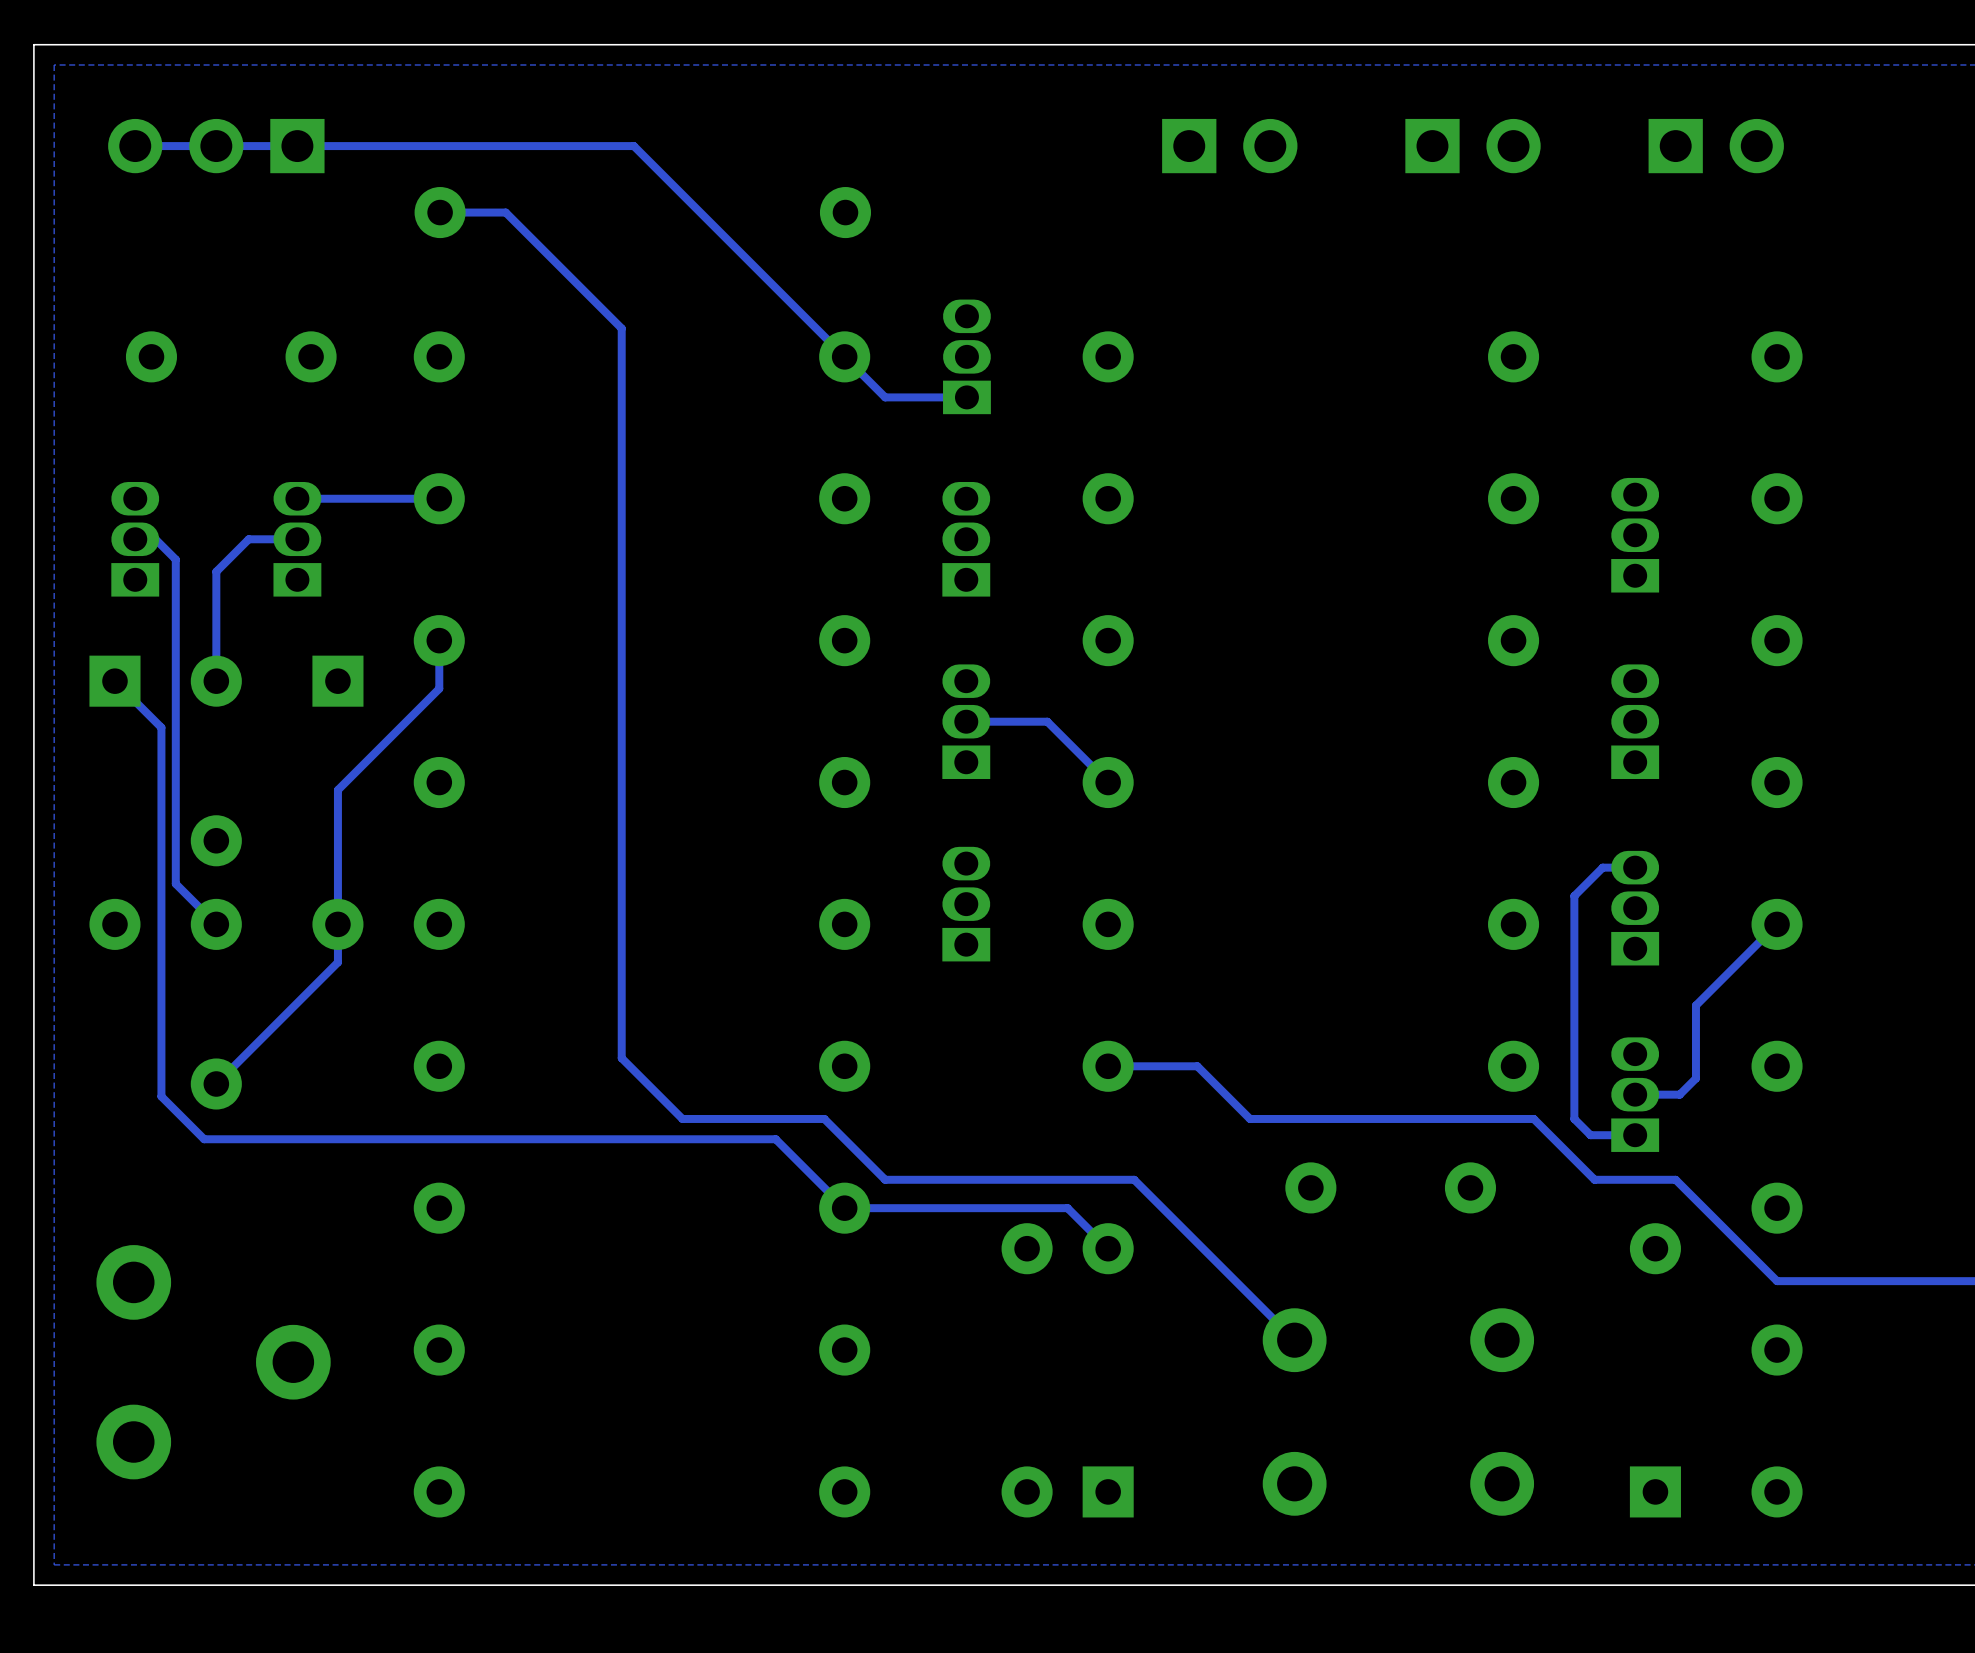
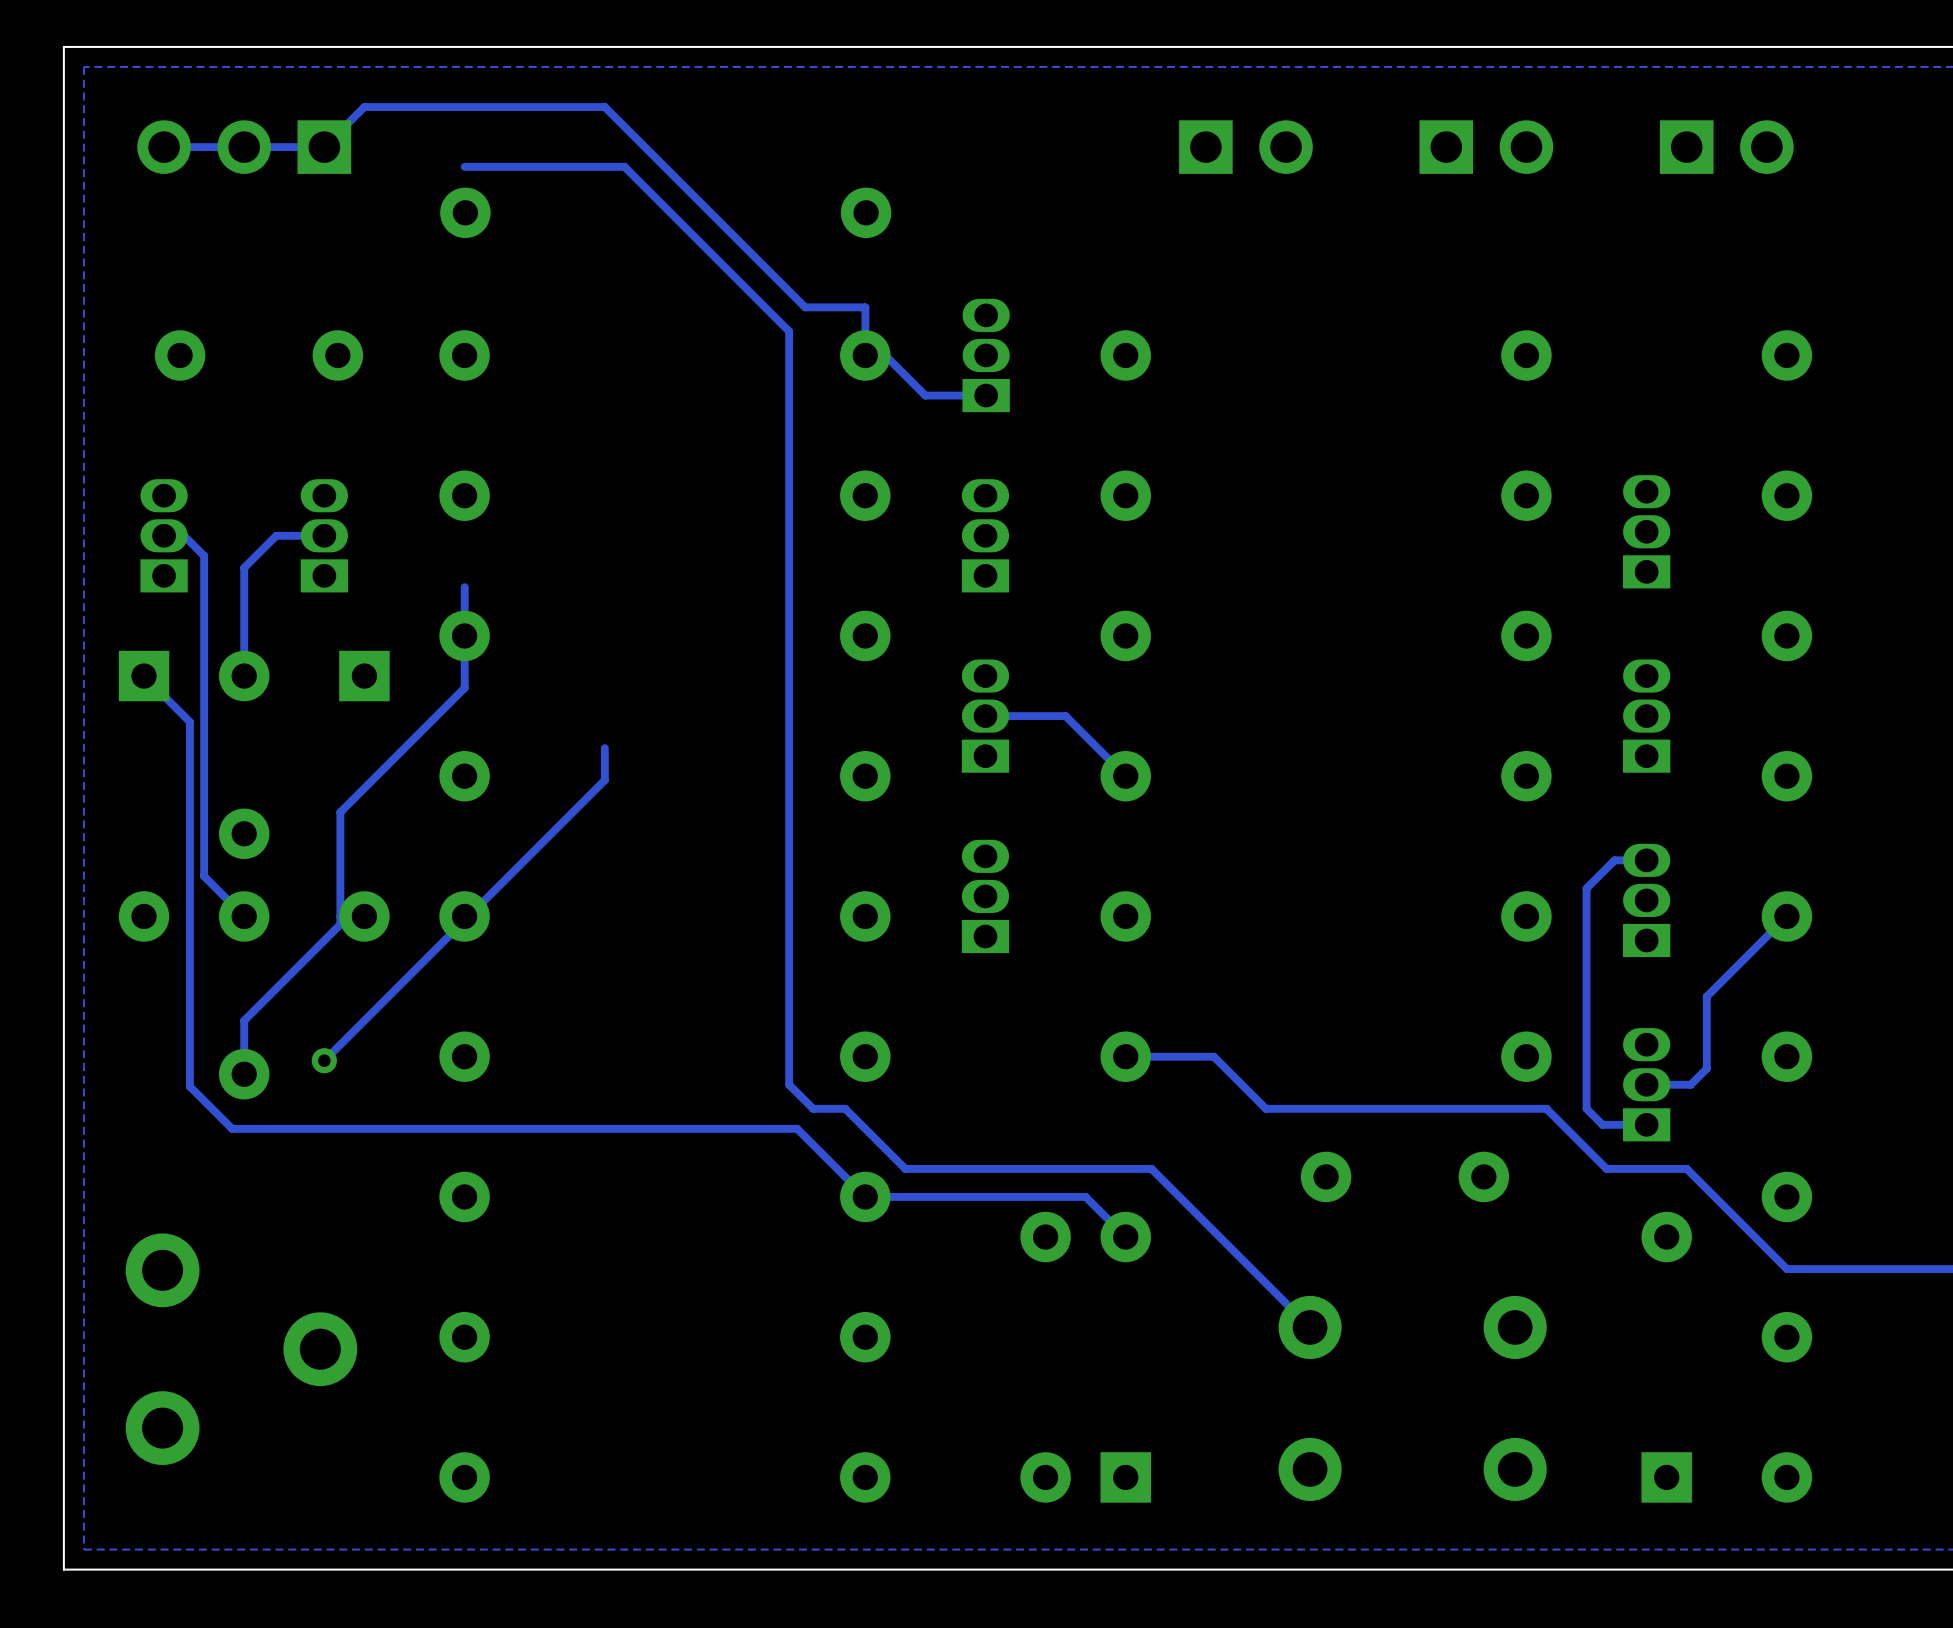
track: (297, 146) (633, 146) (885, 397) (905, 397) -> (324, 147) (364, 107) (604, 107) (805, 307) (865, 307) (865, 335) (925, 395)
track: (440, 212) (505, 212) (621, 328) (621, 1058) (682, 1118) (791, 1118) -> (464, 166) (624, 166) (789, 331) (789, 1084) (813, 1108)
track: (439, 498) (297, 498) -> none
track: (439, 640) (439, 688) (337, 790) (337, 962) (216, 1084) -> (464, 587) (464, 687) (340, 812) (340, 924) (244, 1020) (244, 1074)
track: none -> (604, 748) (604, 780) (324, 1060)
via: none -> (324, 1060)

